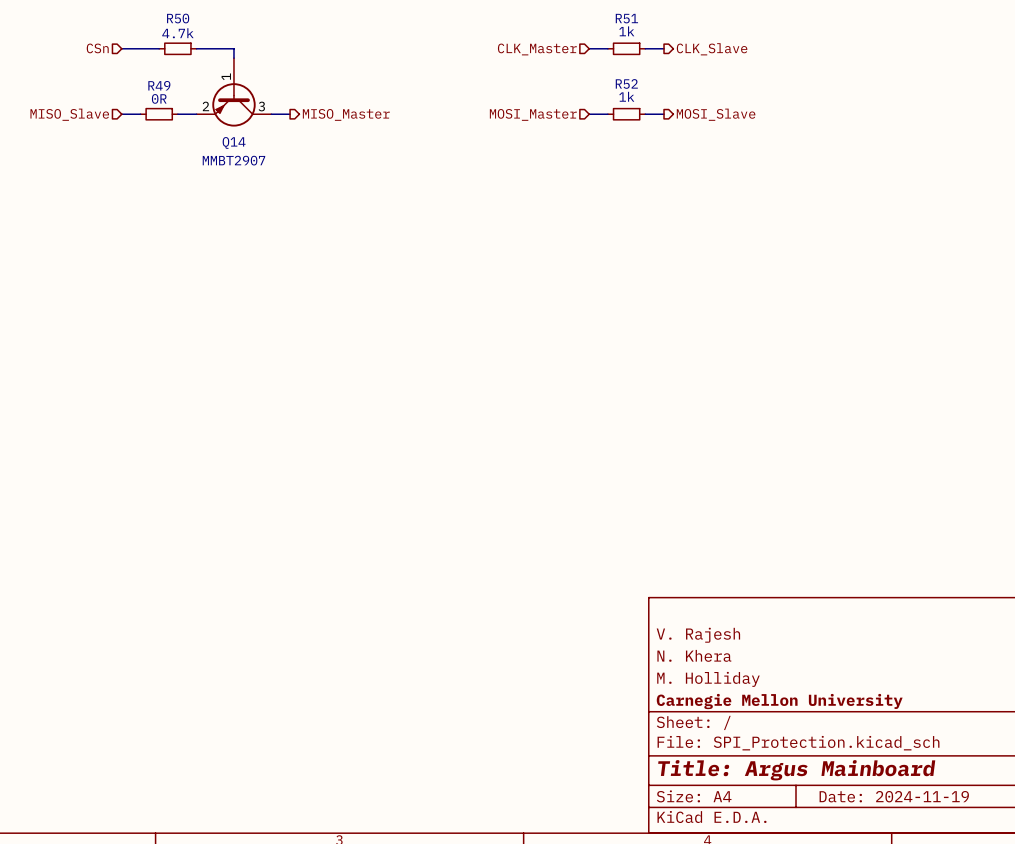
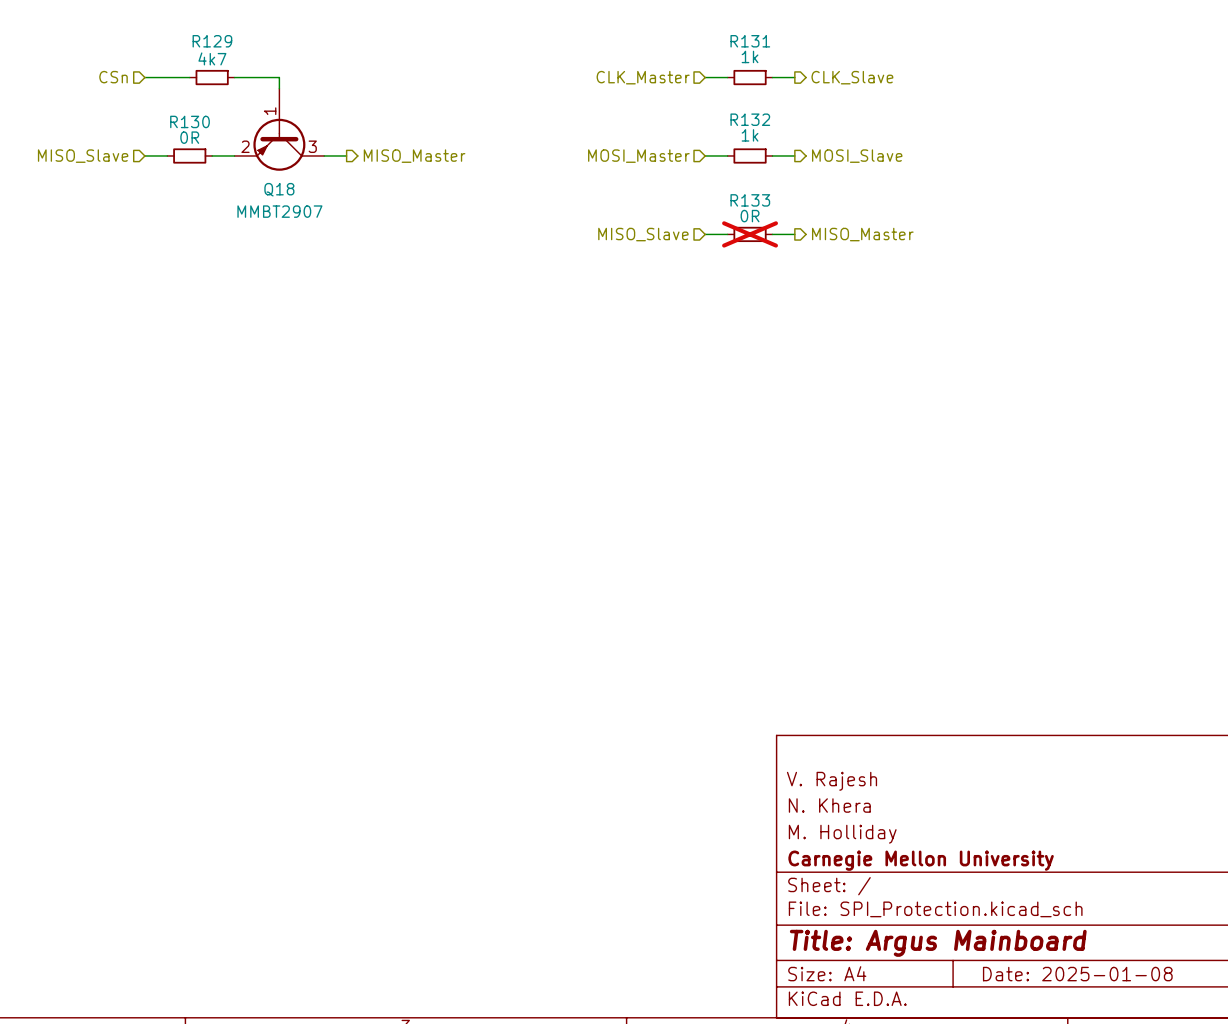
R50 name: R50 (178, 18) -> R129 (212, 41)
R51 name: R51 (626, 18) -> R131 (750, 41)
R50 value: 4.7k (177, 33) -> 4k7 (212, 58)
R52 name: R52 (626, 83) -> R132 (750, 119)
R49 name: R49 (159, 85) -> R130 (190, 121)
Q14 name: Q14 (234, 142) -> Q18 (279, 189)
wire: none -> (705, 234) (727, 234)
R133: none -> 0R (750, 234)
wire: none -> (772, 234) (794, 234)
hierarchical label: none -> MISO_Slave (643, 234)
hierarchical label: none -> MISO_Master (862, 234)
title block: Date: 2024-11-19 (894, 796) -> Date: 2025-01-08 (1077, 974)

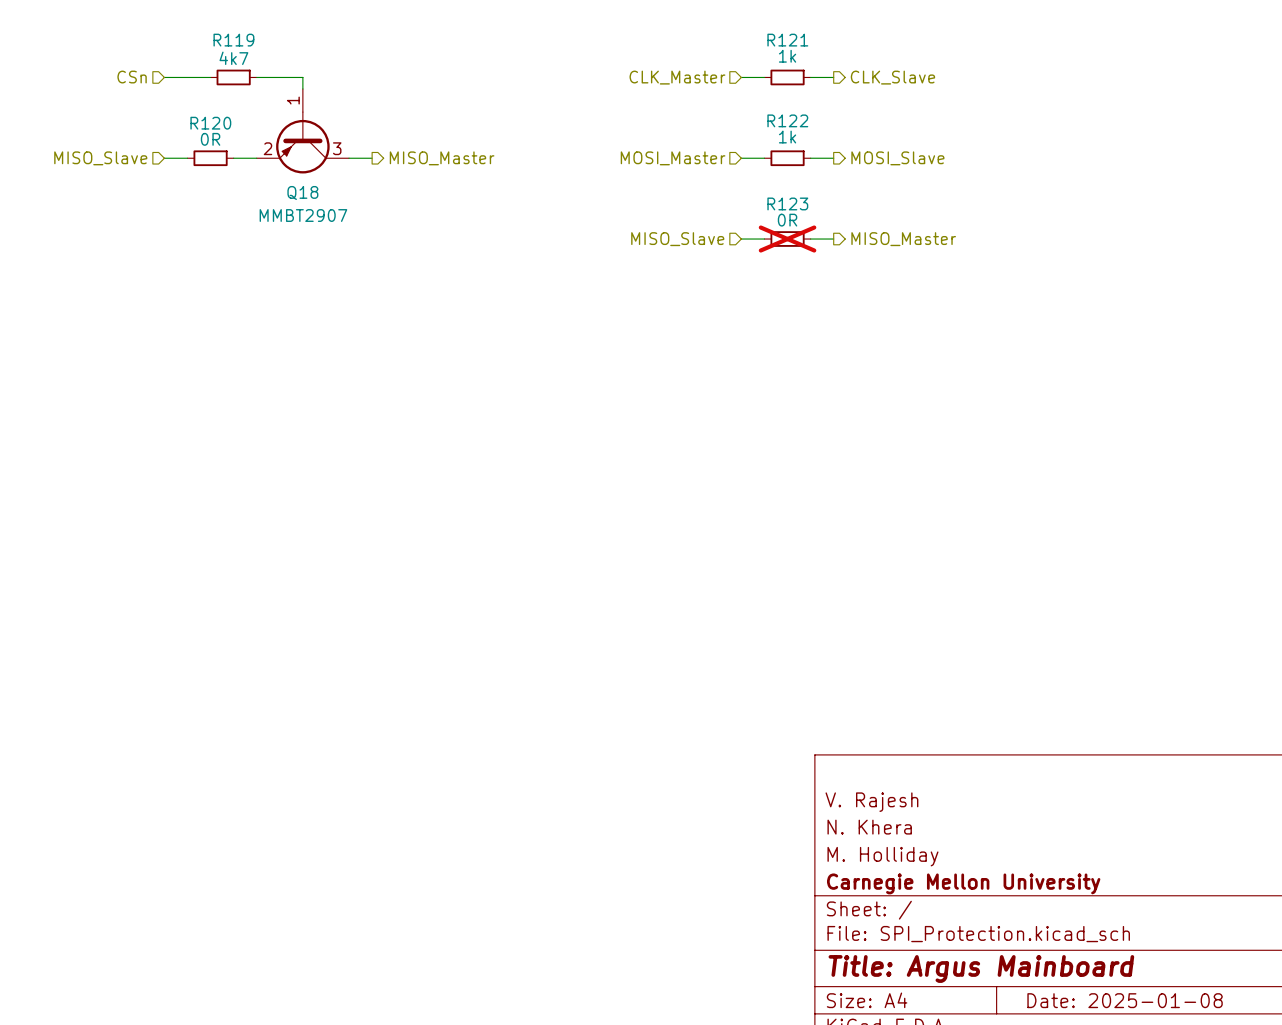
R129 name: R129 (212, 41) -> R119 (233, 40)
R131 name: R131 (750, 41) -> R121 (787, 40)
Q18 symbol: [234, 88, 325, 171] -> [256, 89, 350, 174]
R132 name: R132 (750, 119) -> R122 (787, 120)
R130 name: R130 (190, 121) -> R120 (210, 123)
R133 name: R133 (750, 200) -> R123 (787, 203)

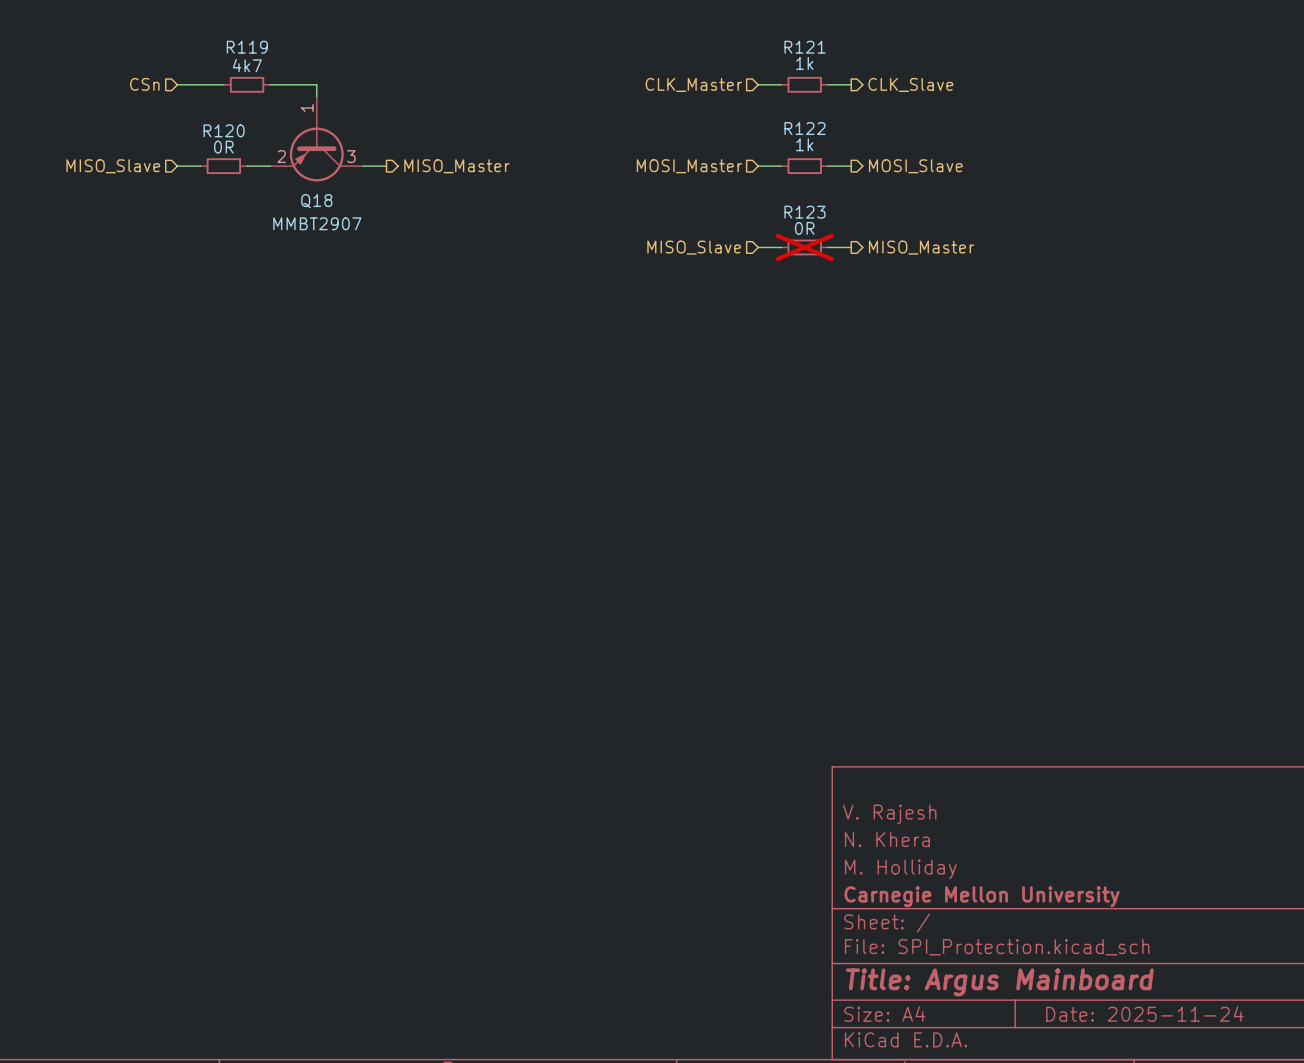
title block: Date: 2025-01-08 (1125, 1000) -> Date: 2025-11-24 (1144, 1013)

